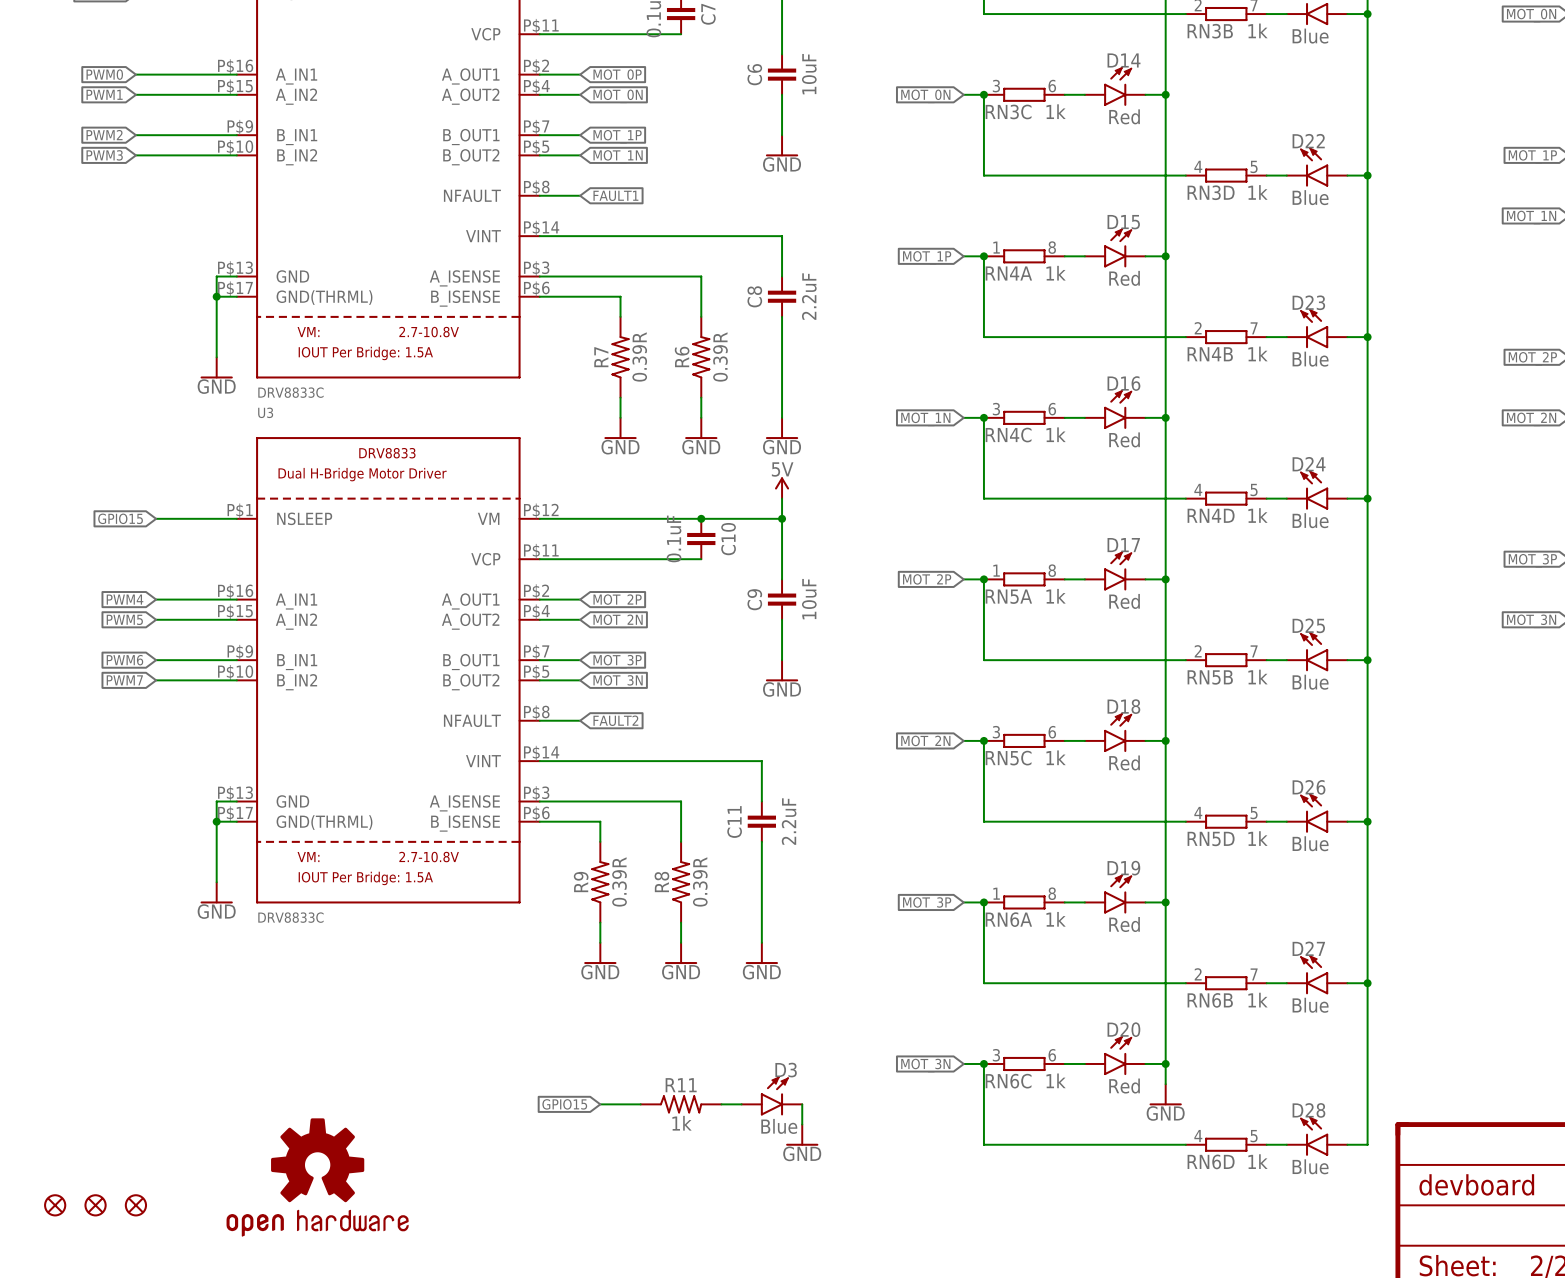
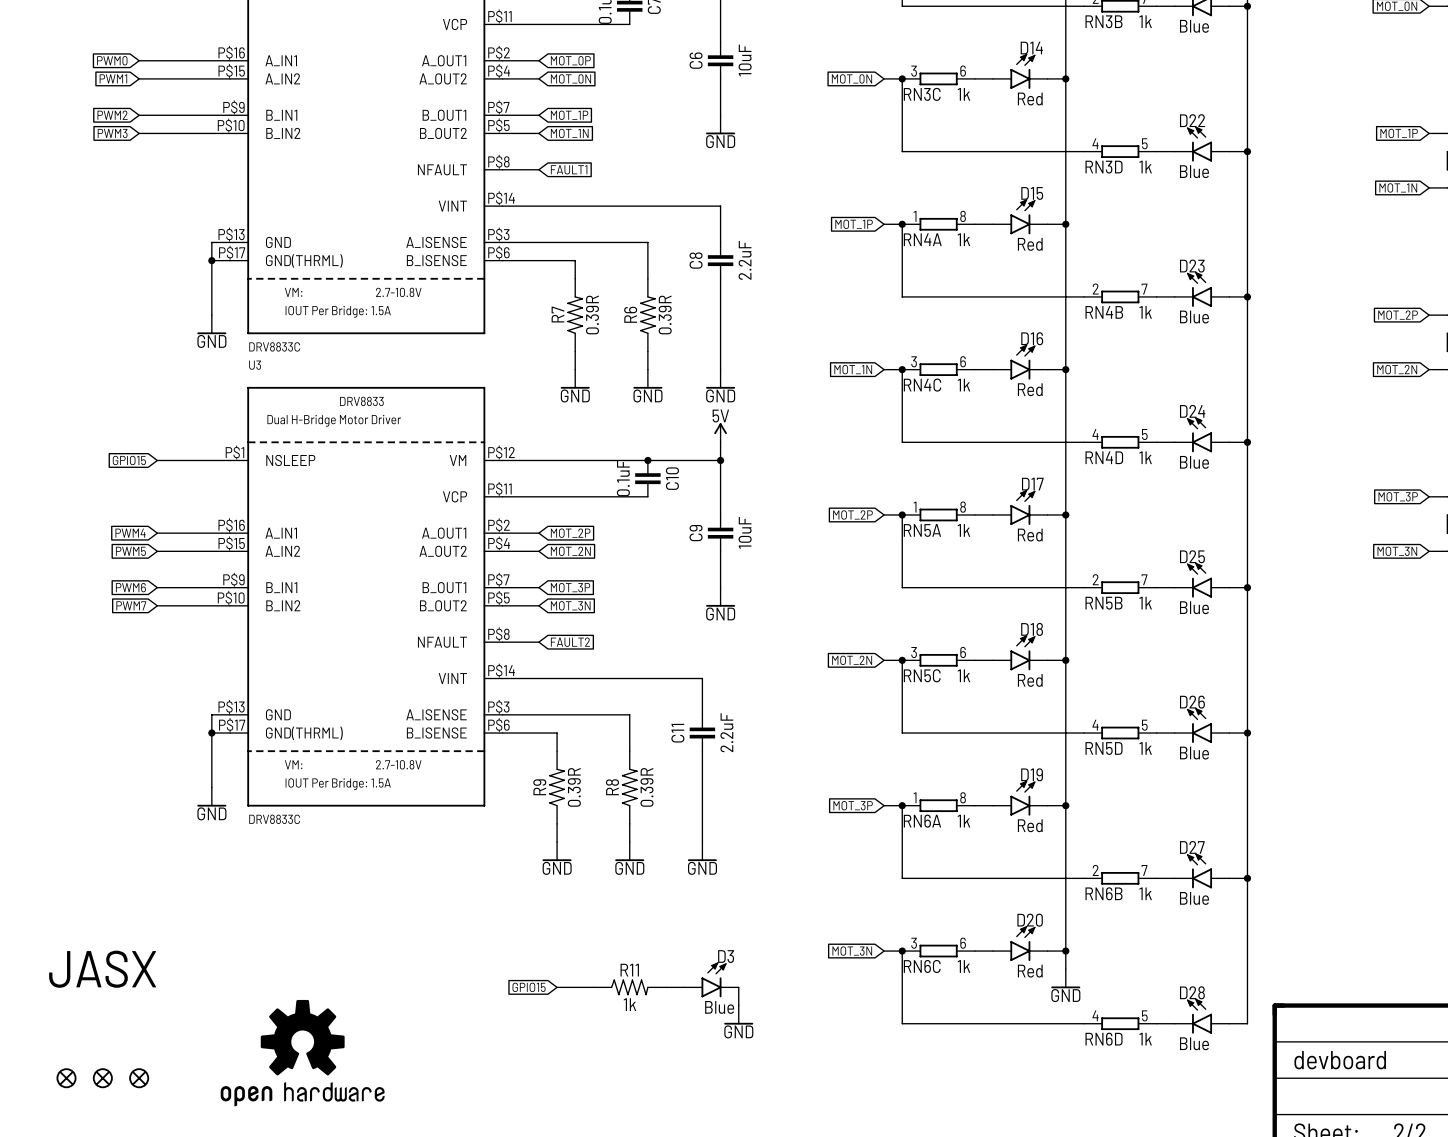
part: none -> (102, 969)

